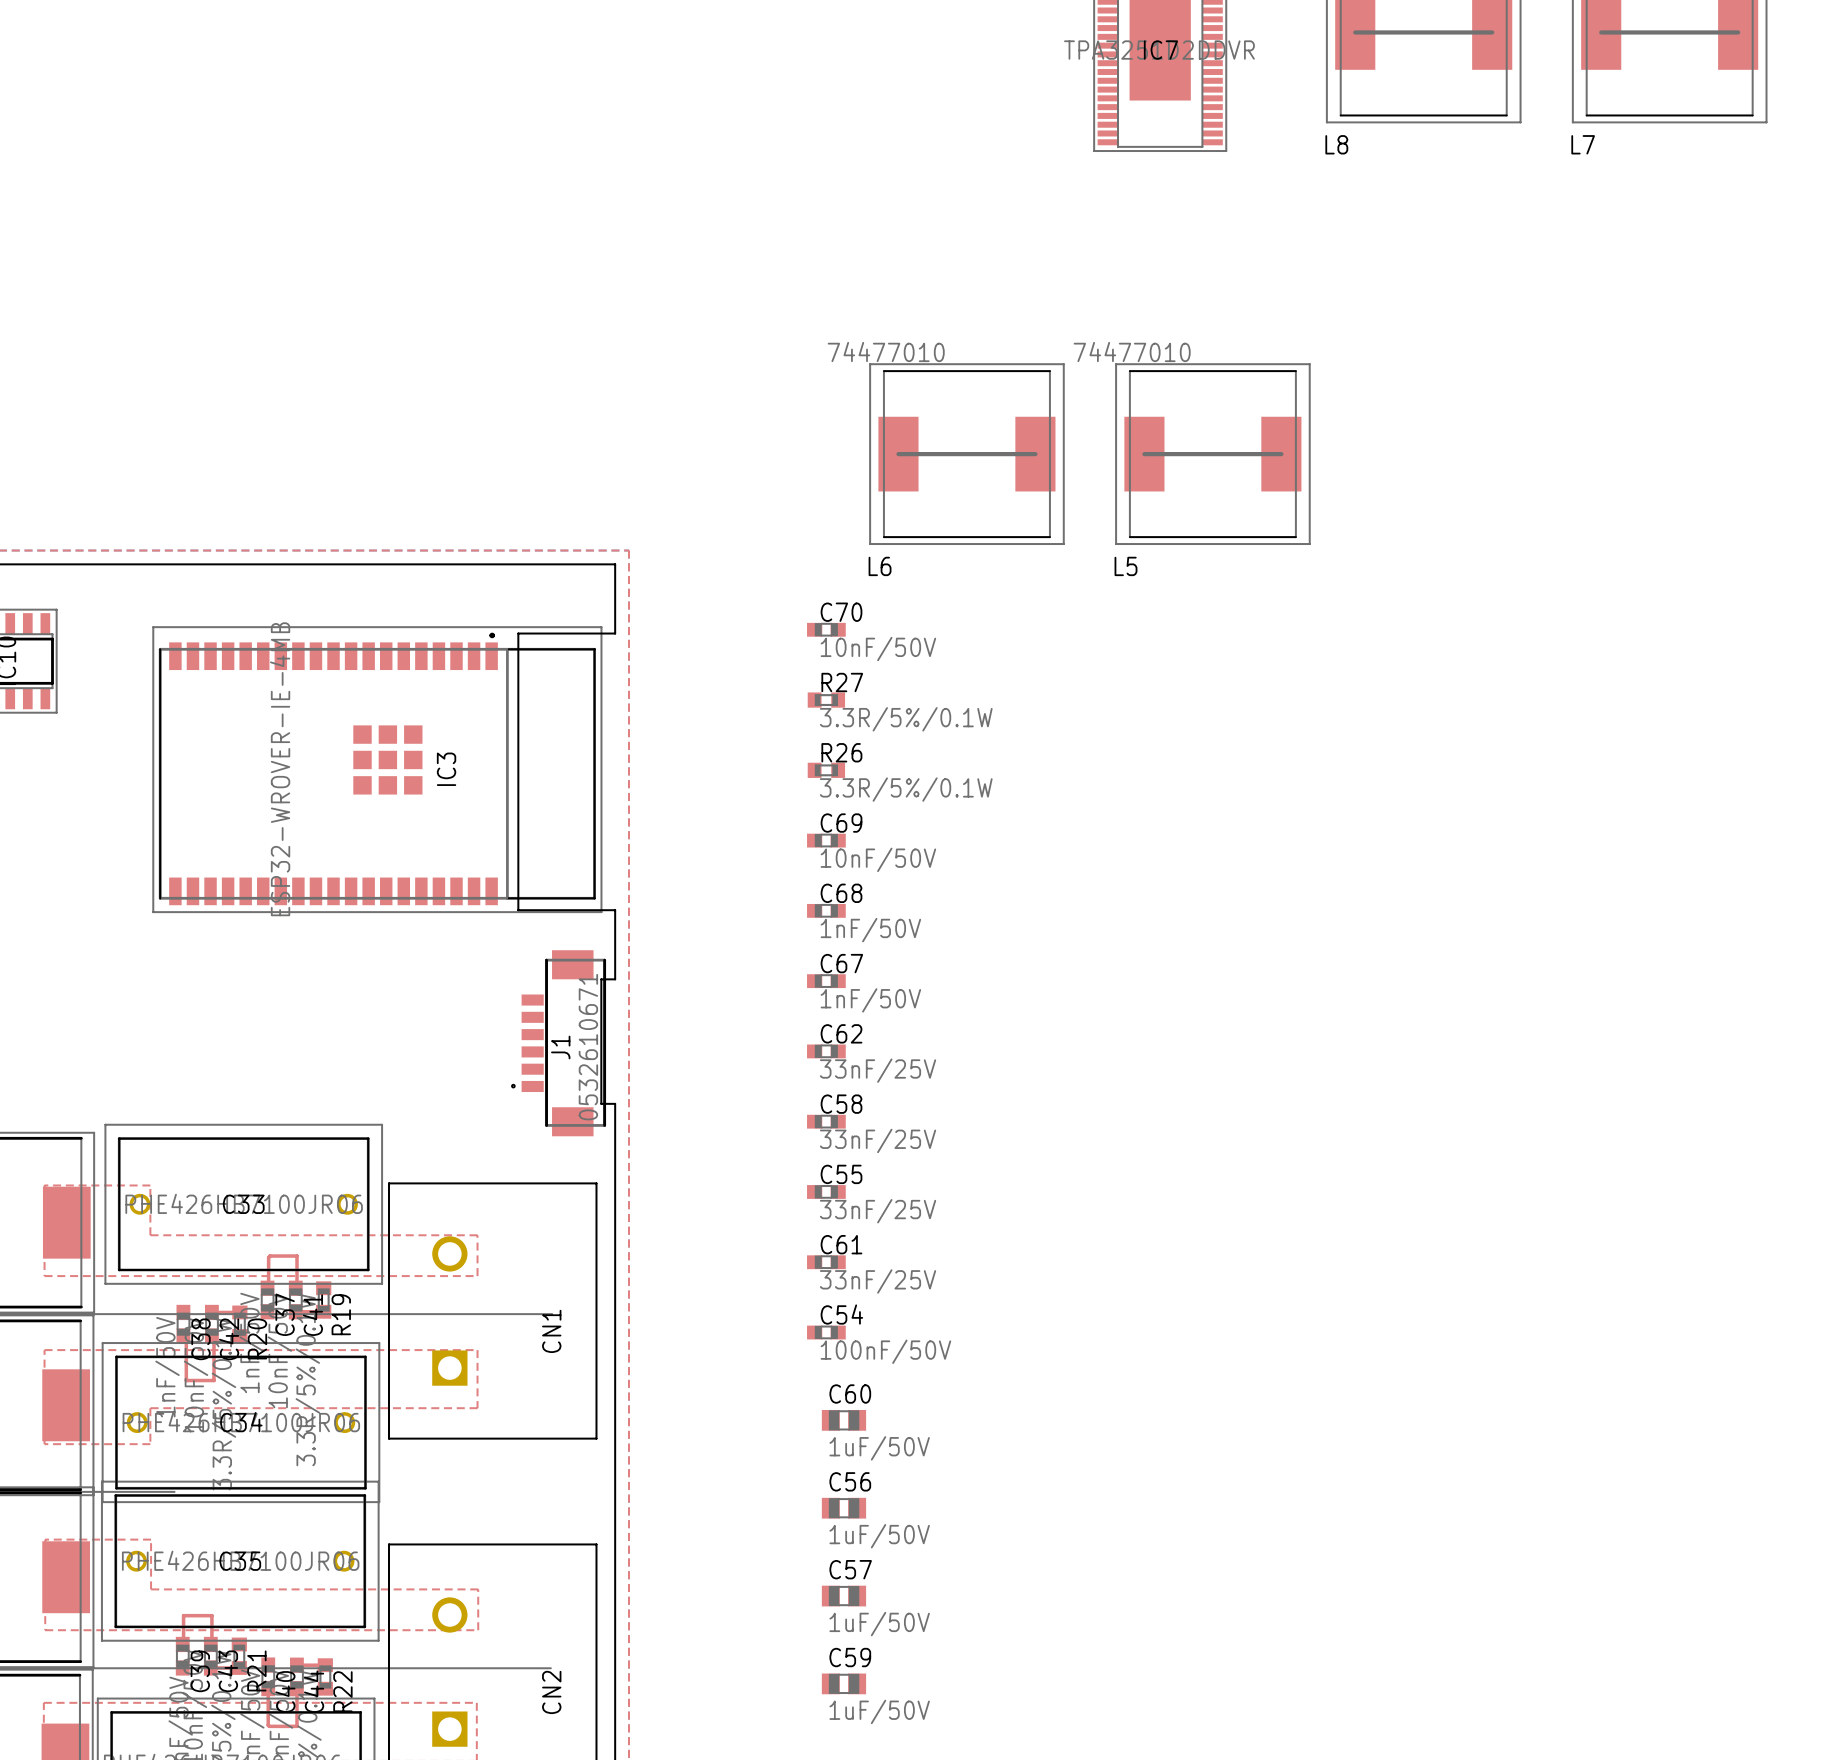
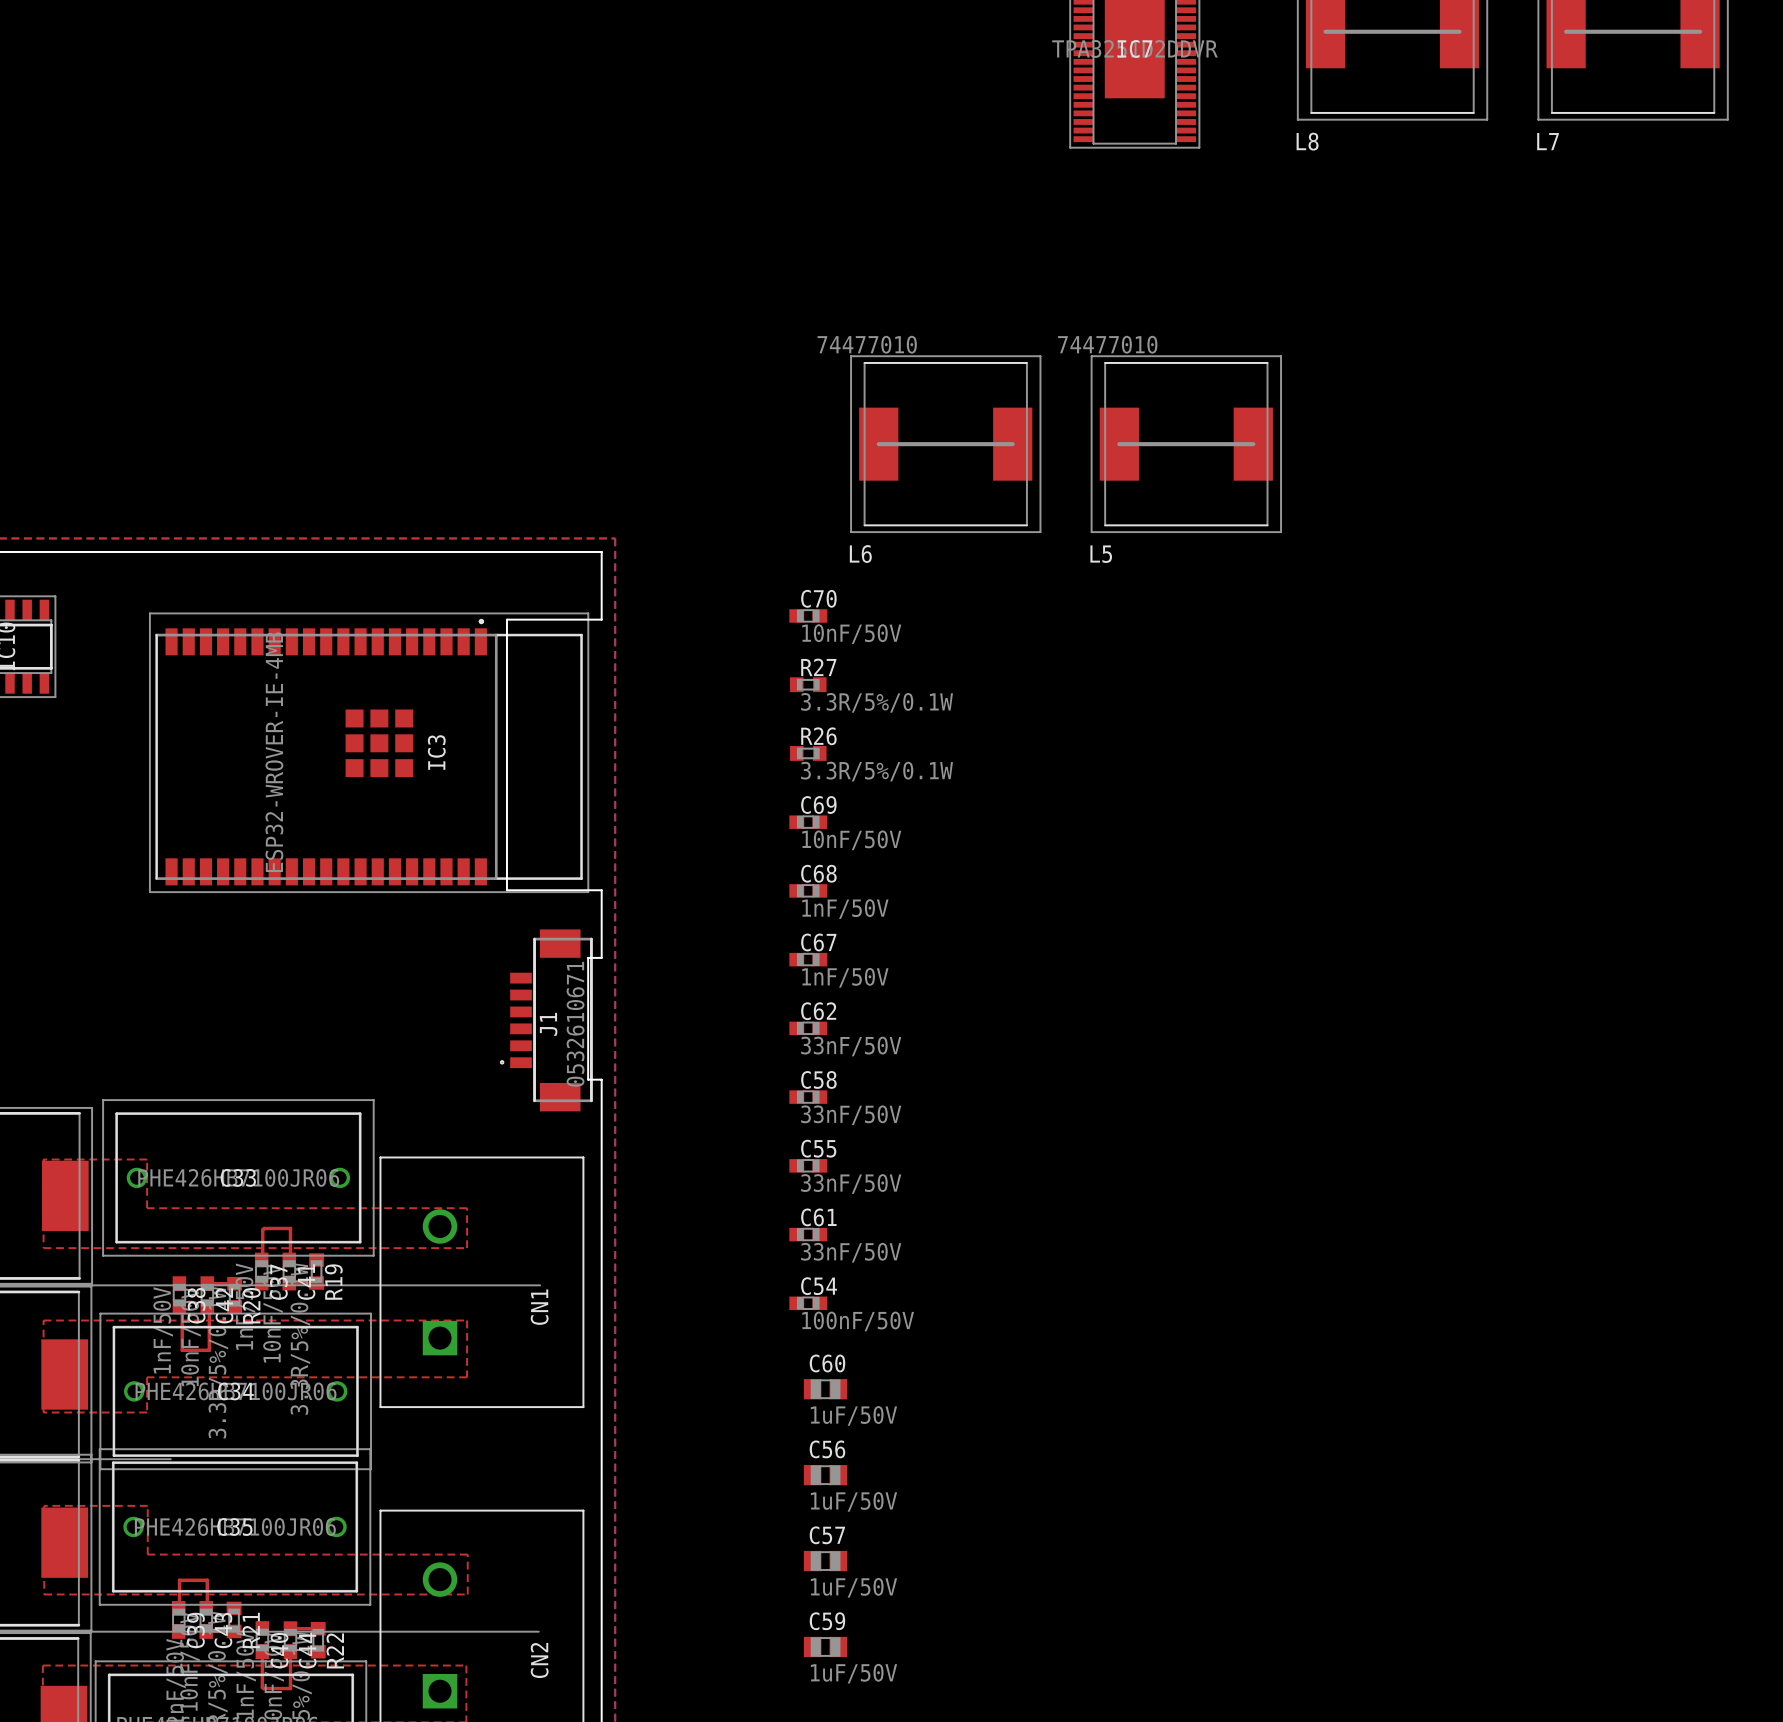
C62 value: 33nF/25V (878, 1070) -> 33nF/50V (851, 1046)
C58 value: 33nF/25V (878, 1140) -> 33nF/50V (851, 1115)
C55 value: 33nF/25V (878, 1211) -> 33nF/50V (851, 1183)
C61 value: 33nF/25V (878, 1281) -> 33nF/50V (851, 1252)

